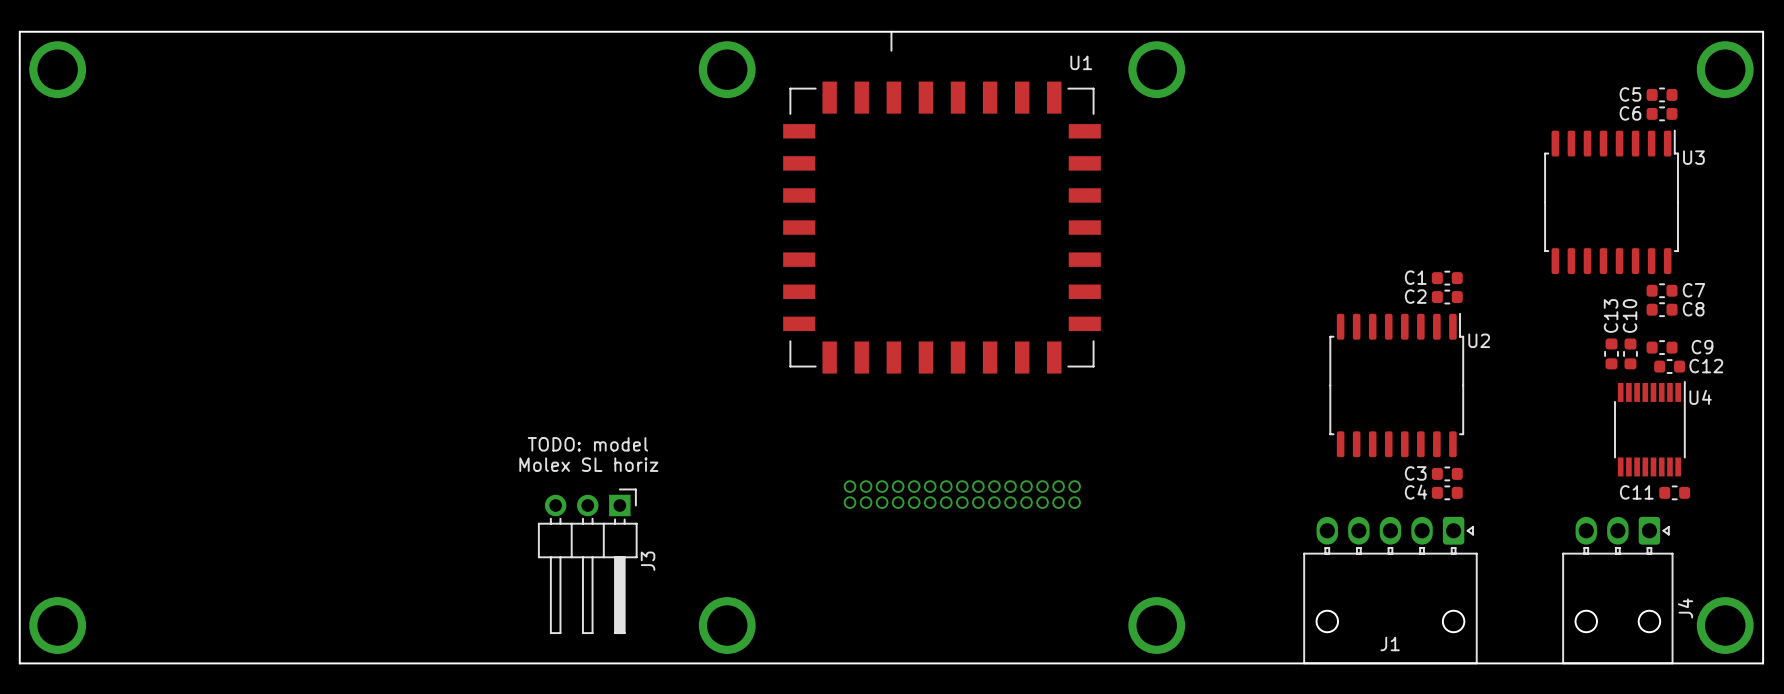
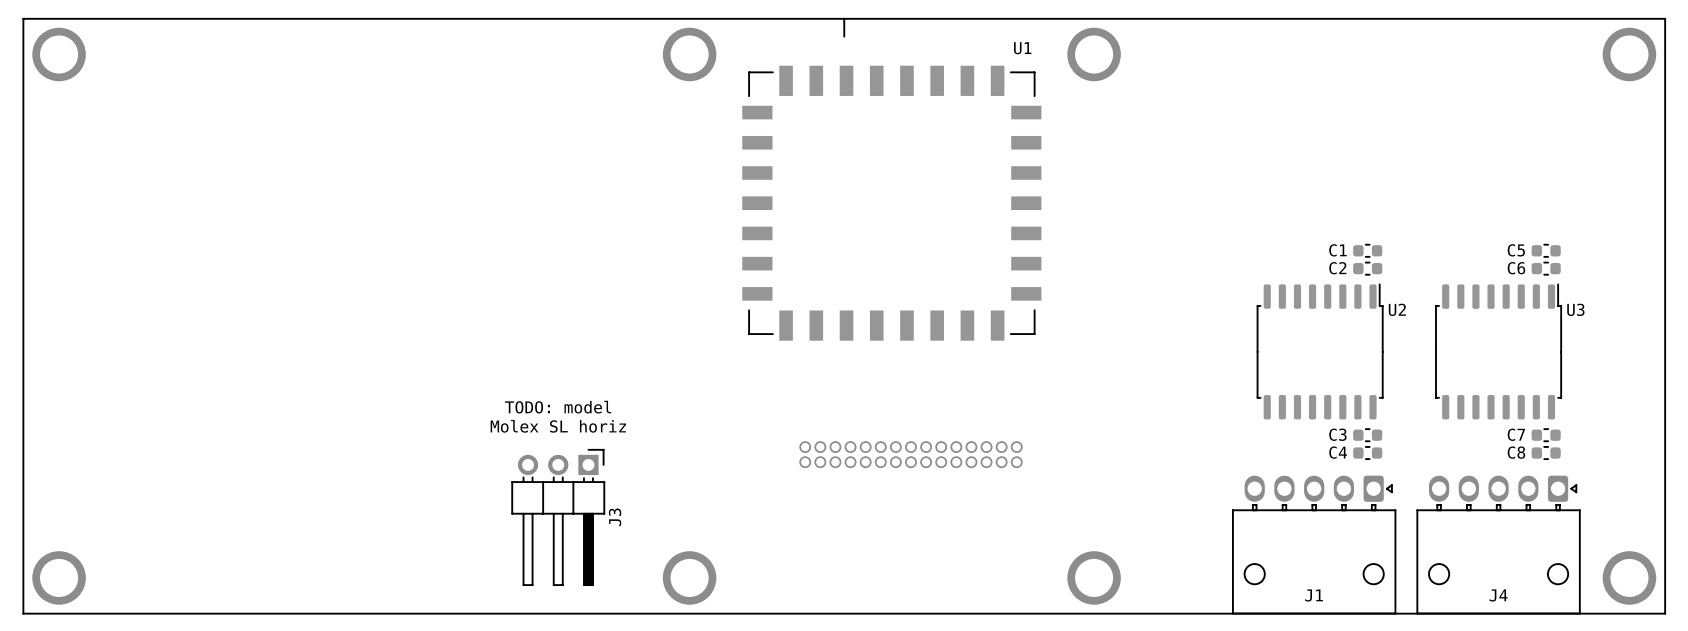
C5 position: (1662, 94) -> (1546, 250)
C6 position: (1662, 113) -> (1546, 268)
U3 position: (1611, 201) -> (1498, 351)
C7 position: (1662, 290) -> (1546, 435)
C7 name position: C7 (1693, 290) -> C7 (1516, 434)
C8 position: (1662, 309) -> (1546, 453)
C8 name position: C8 (1693, 309) -> C8 (1516, 452)
C9: (1662, 347) -> none
C13: (1611, 353) -> none
C10: (1630, 353) -> none
C12: (1669, 366) -> none
U4: (1649, 428) -> none
C11: (1674, 492) -> none
J4 footprint: [1562, 516, 1674, 665] -> [1416, 475, 1581, 615]
J4 name position: J4 (1685, 608) -> J4 (1498, 595)

